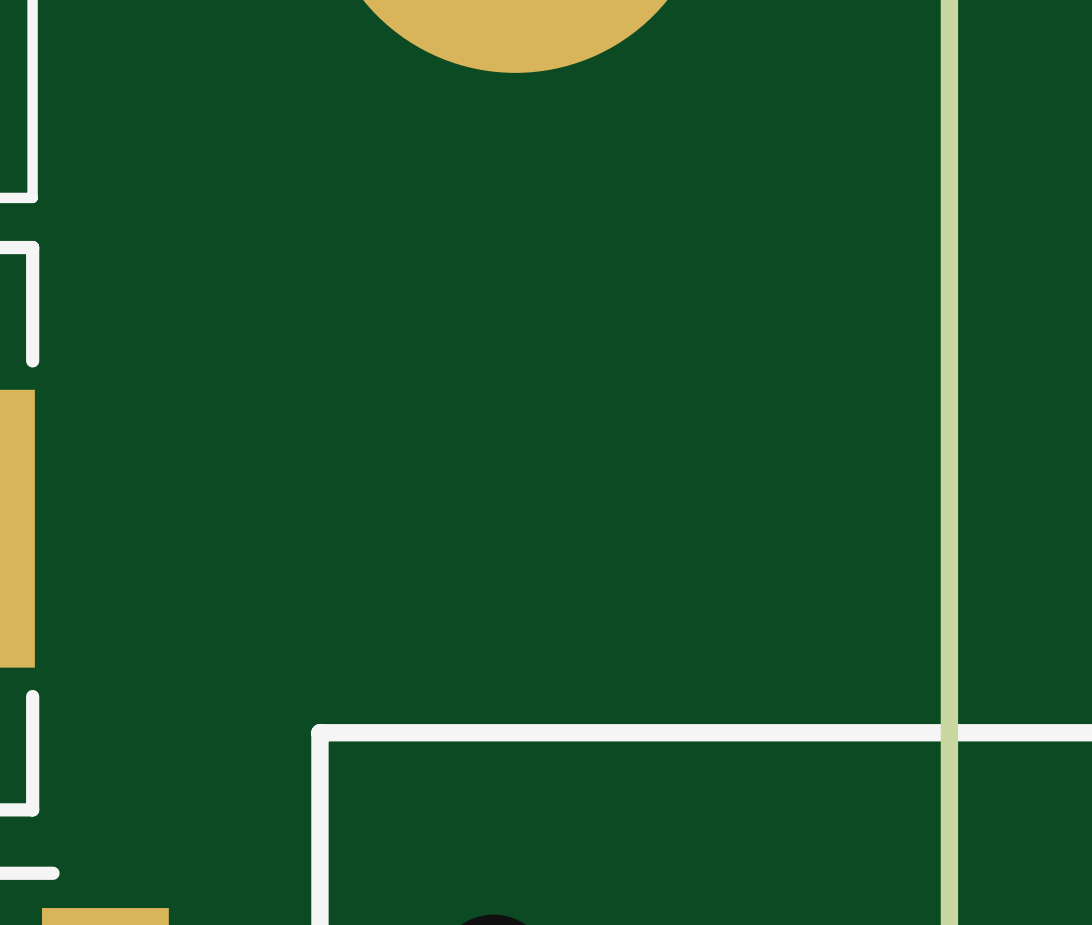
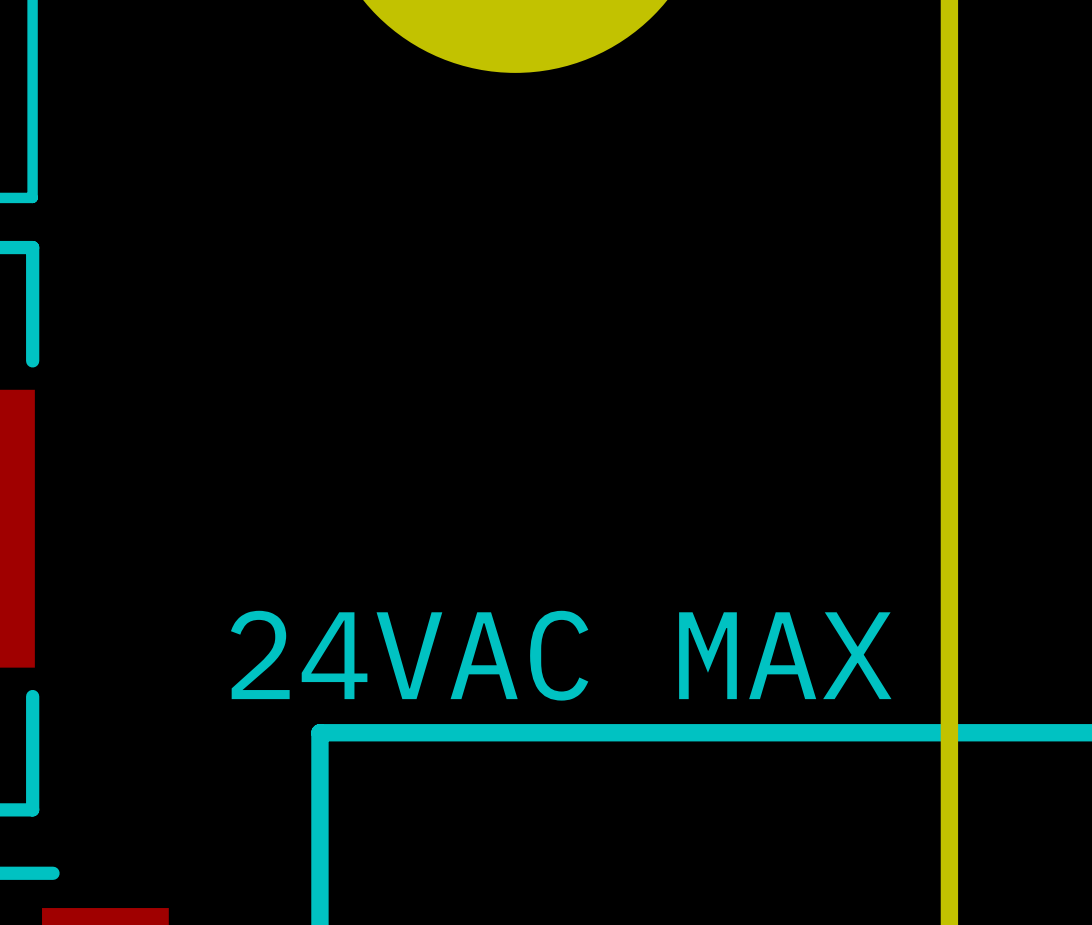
text: none -> 24VAC MAX (561, 655)

